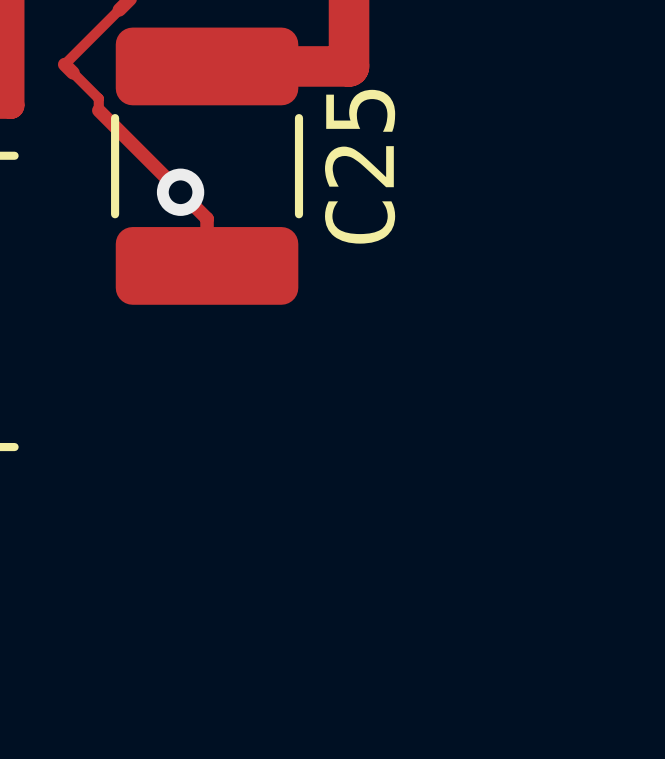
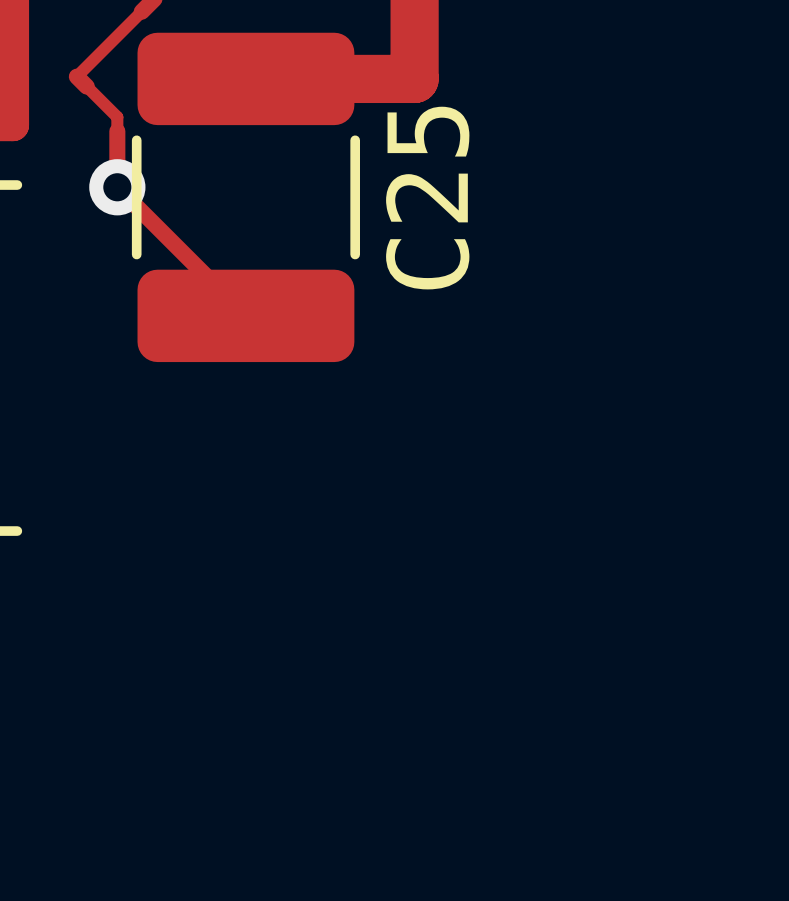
track: (98, 110) (207, 218) (207, 265) -> (117, 131) (117, 187) (245, 315)
via position: (180, 192) -> (117, 187)

